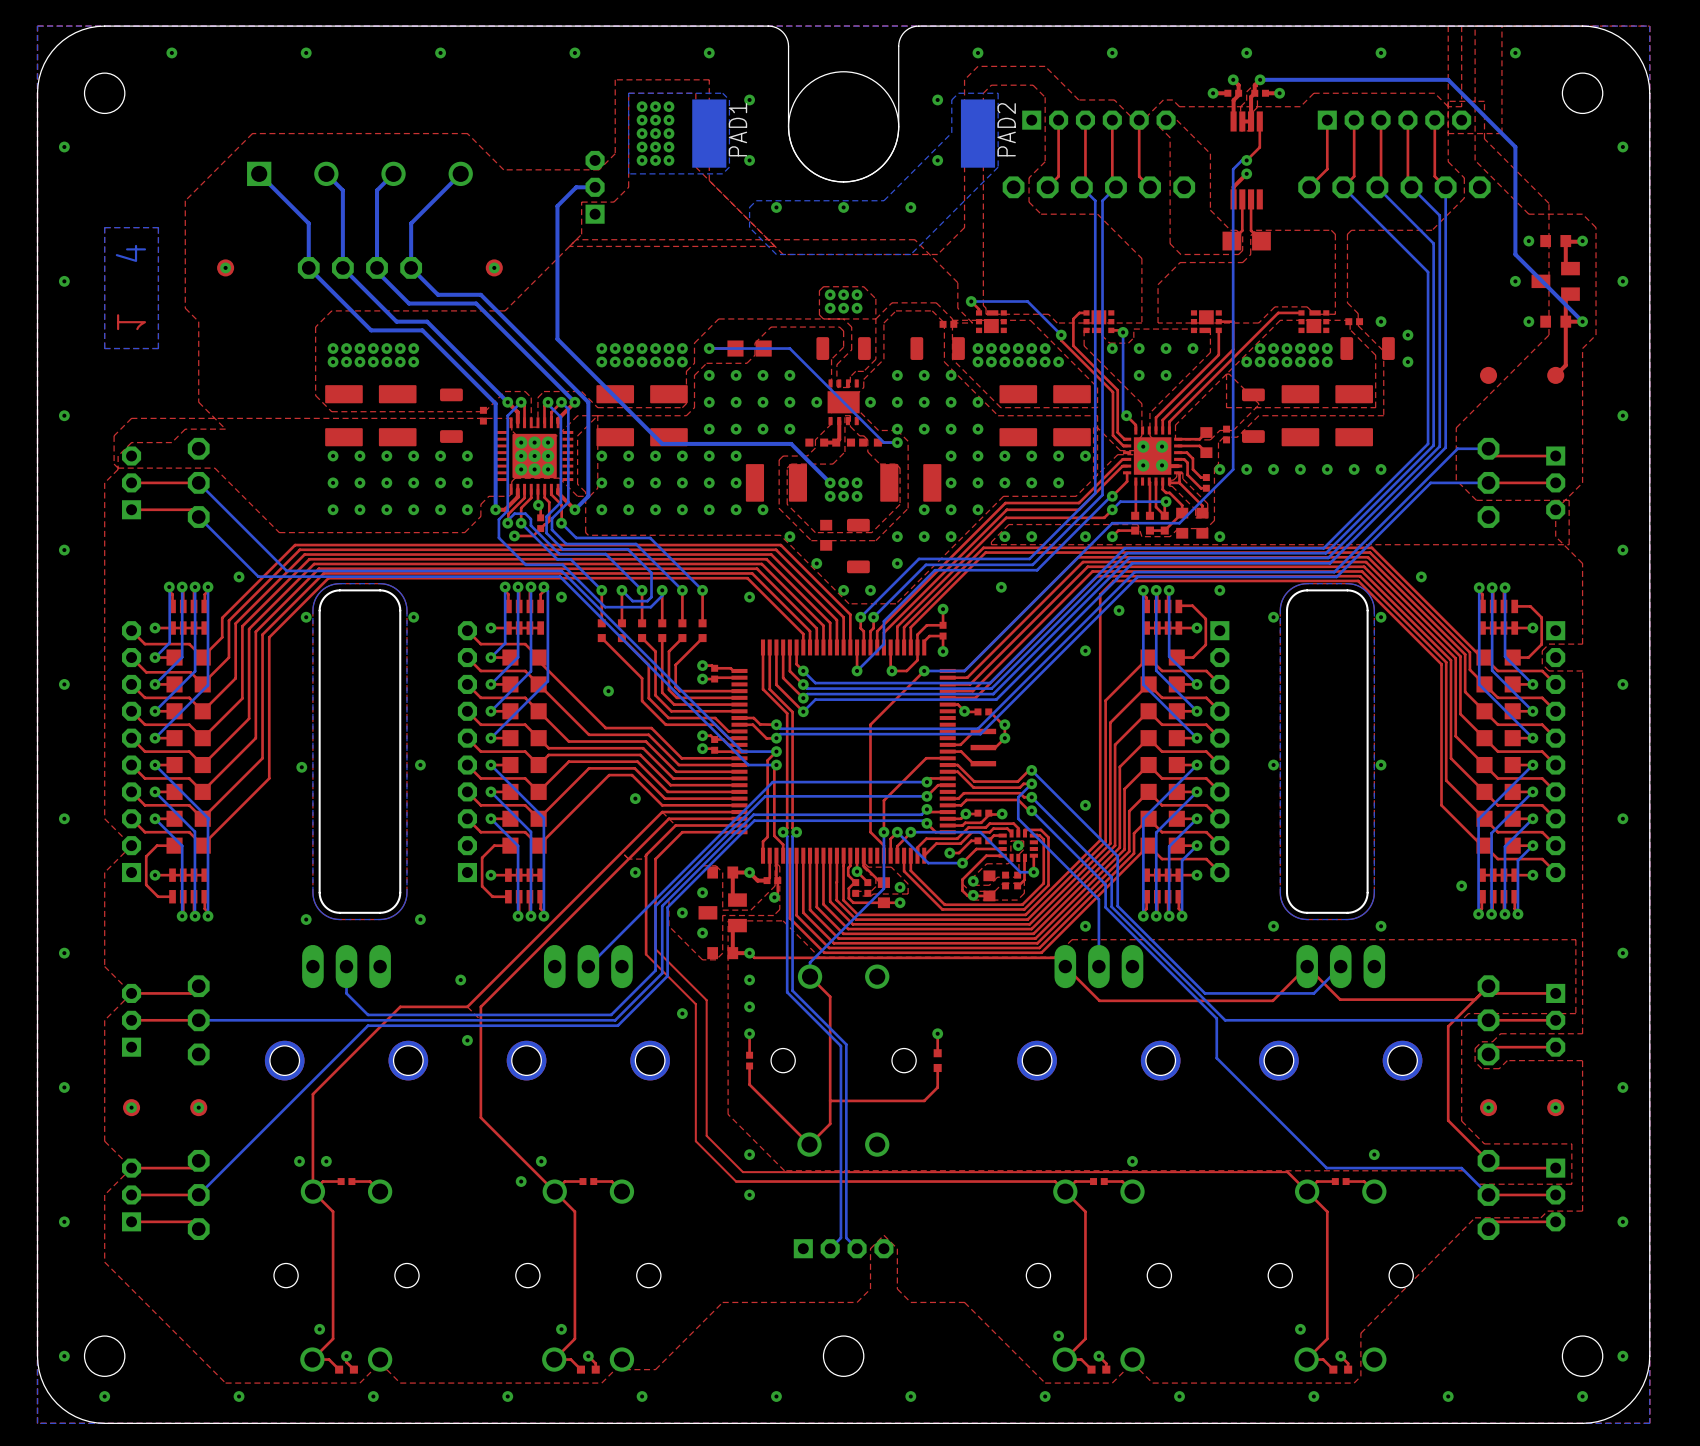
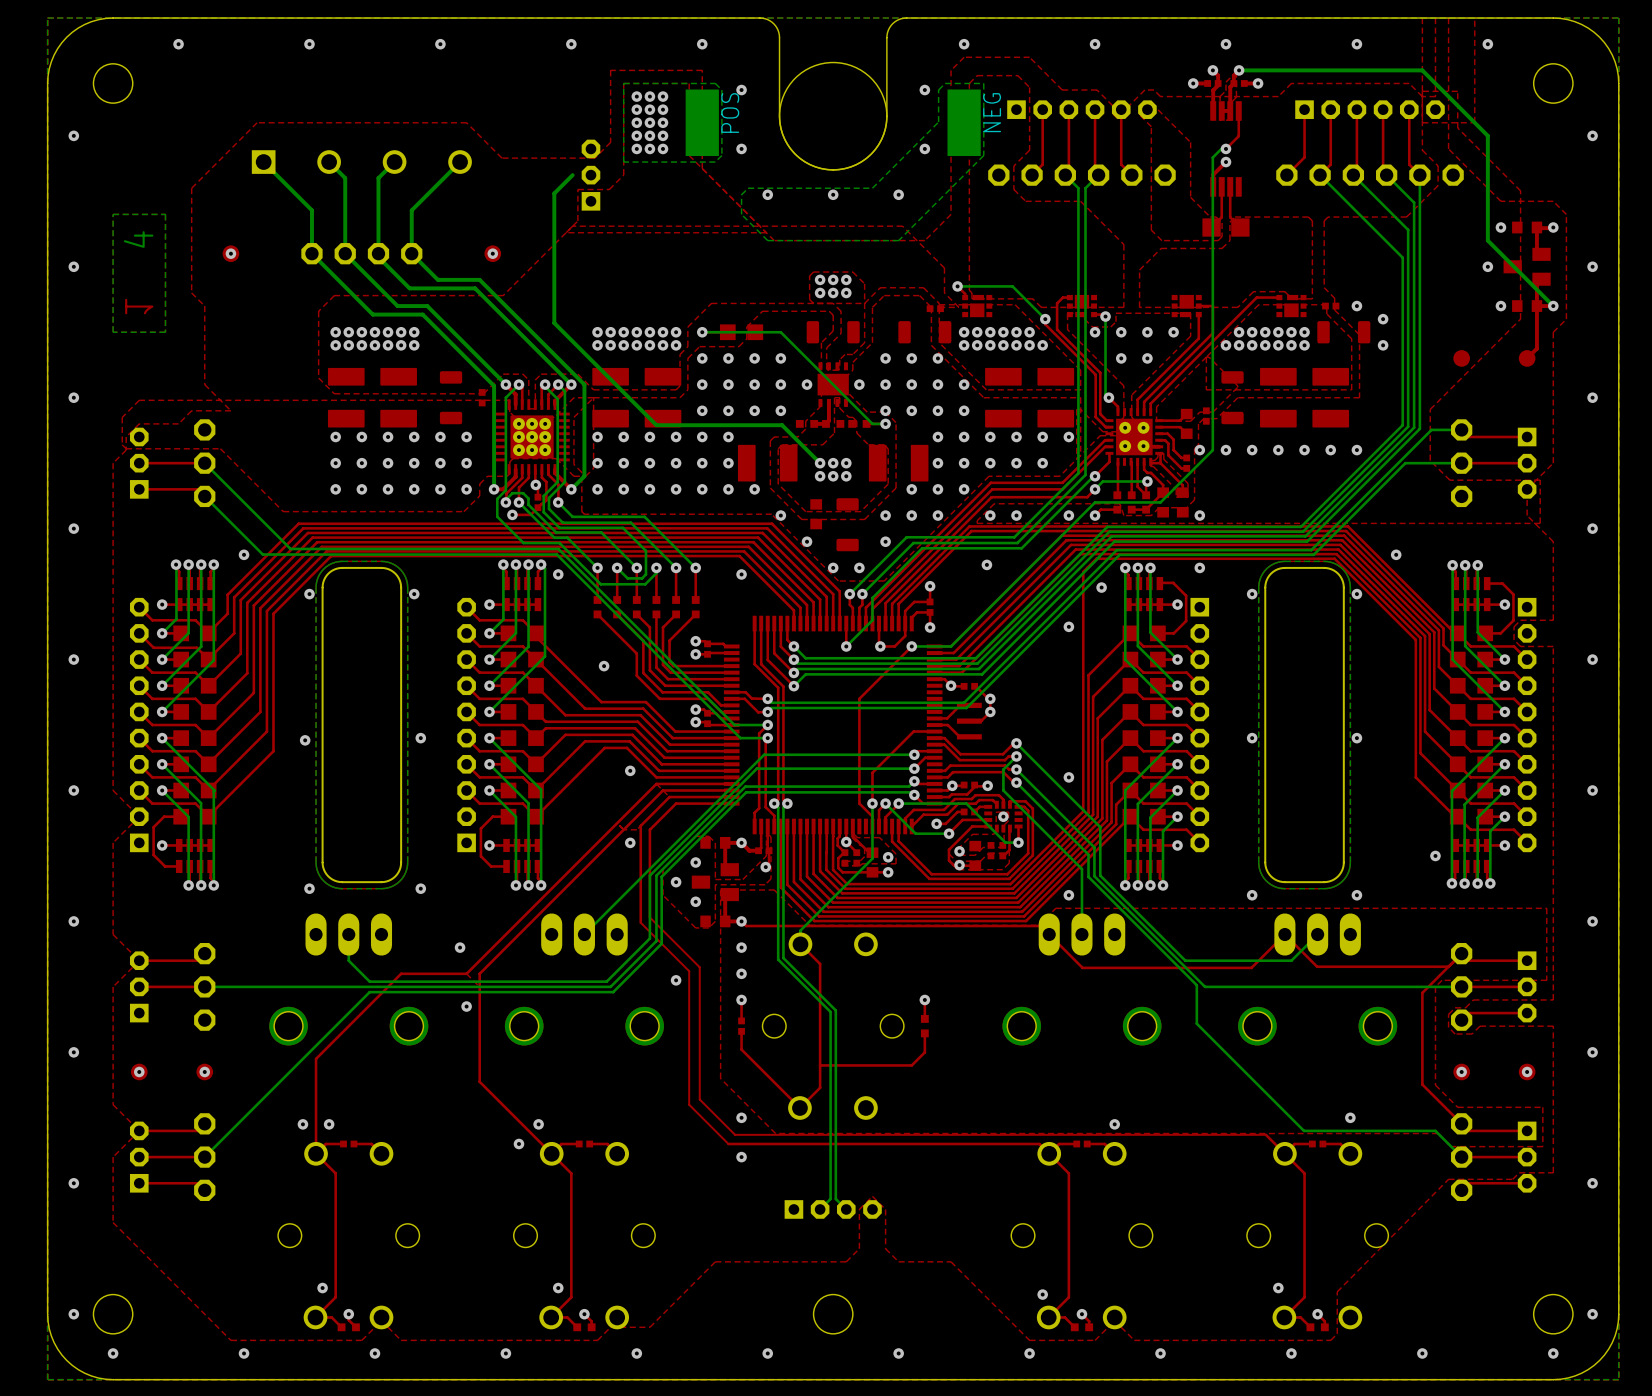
PAD1 name: PAD1 (737, 129) -> POS (730, 113)
PAD2 name: PAD2 (1006, 129) -> NEG (992, 112)
bottom track: (595, 187) (576, 187) -> none

